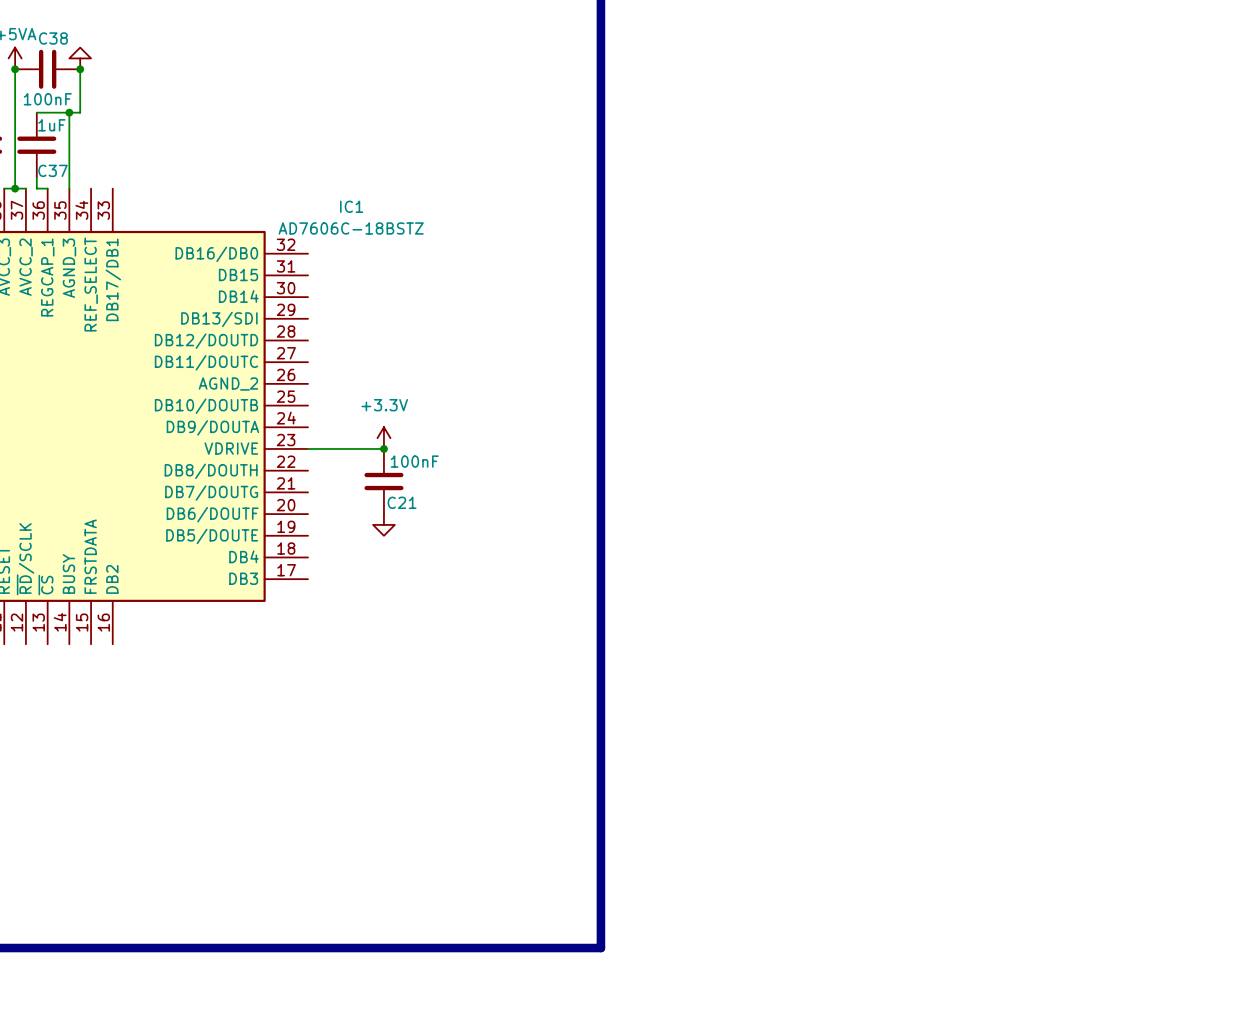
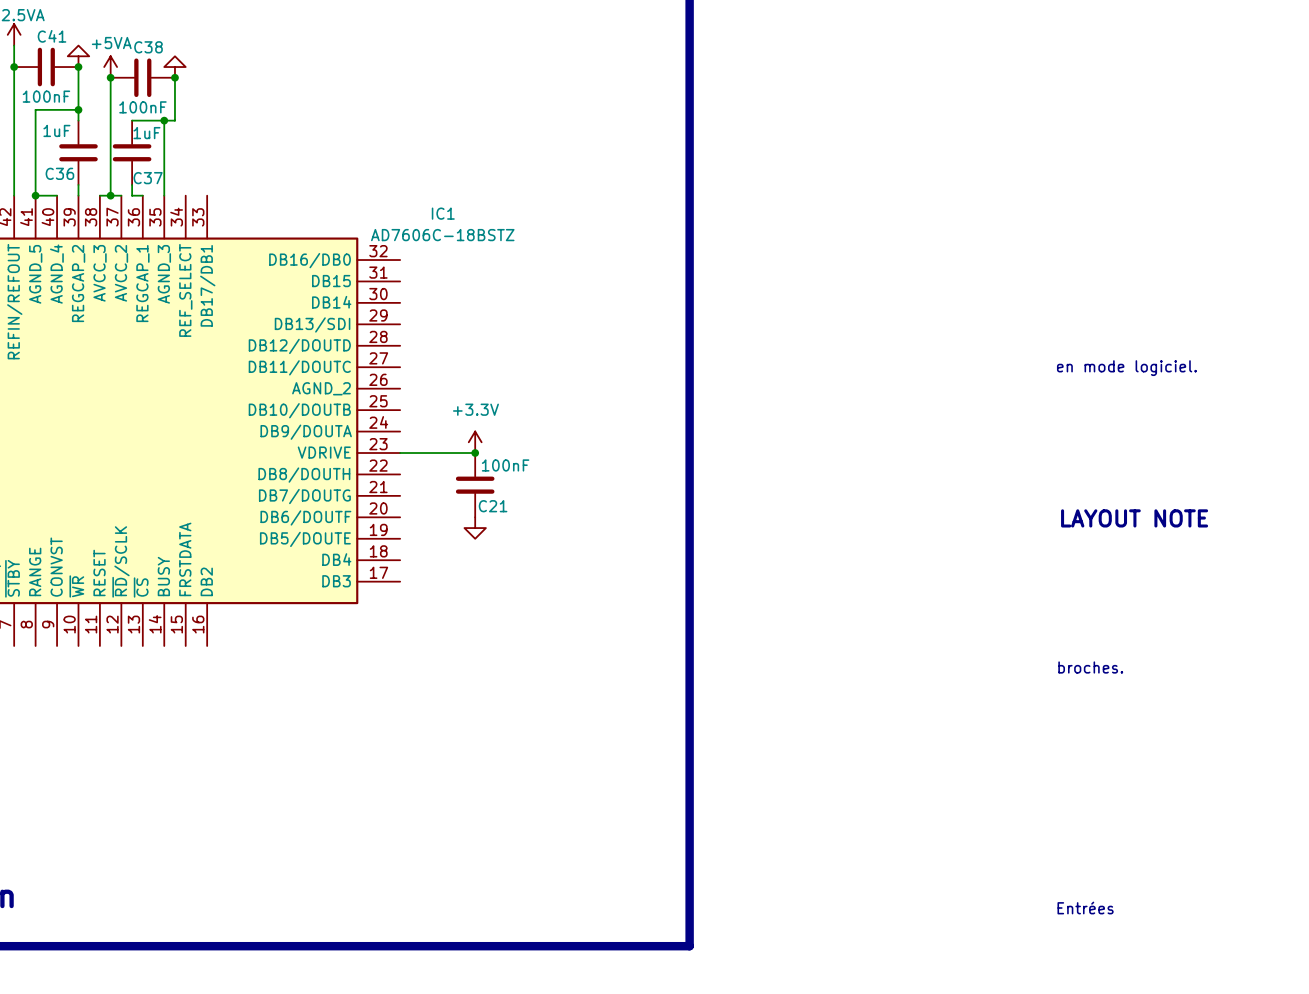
text: none -> en mode logiciel. (1126, 368)
text: none -> LAYOUT NOTE (1134, 518)
text: none -> broches. (1090, 667)
text: none -> Entrées (1085, 908)

